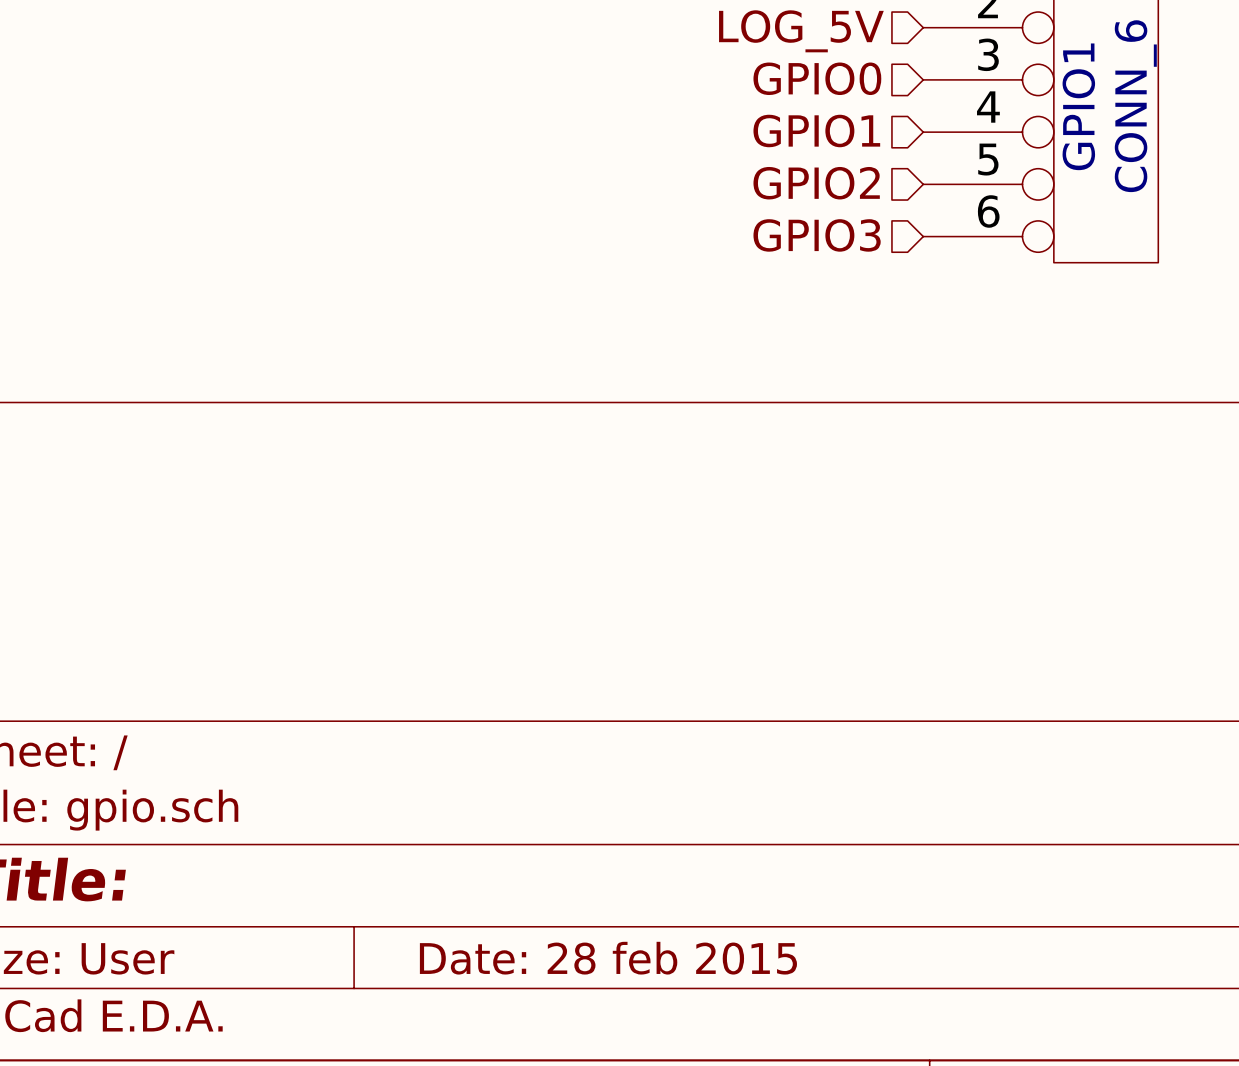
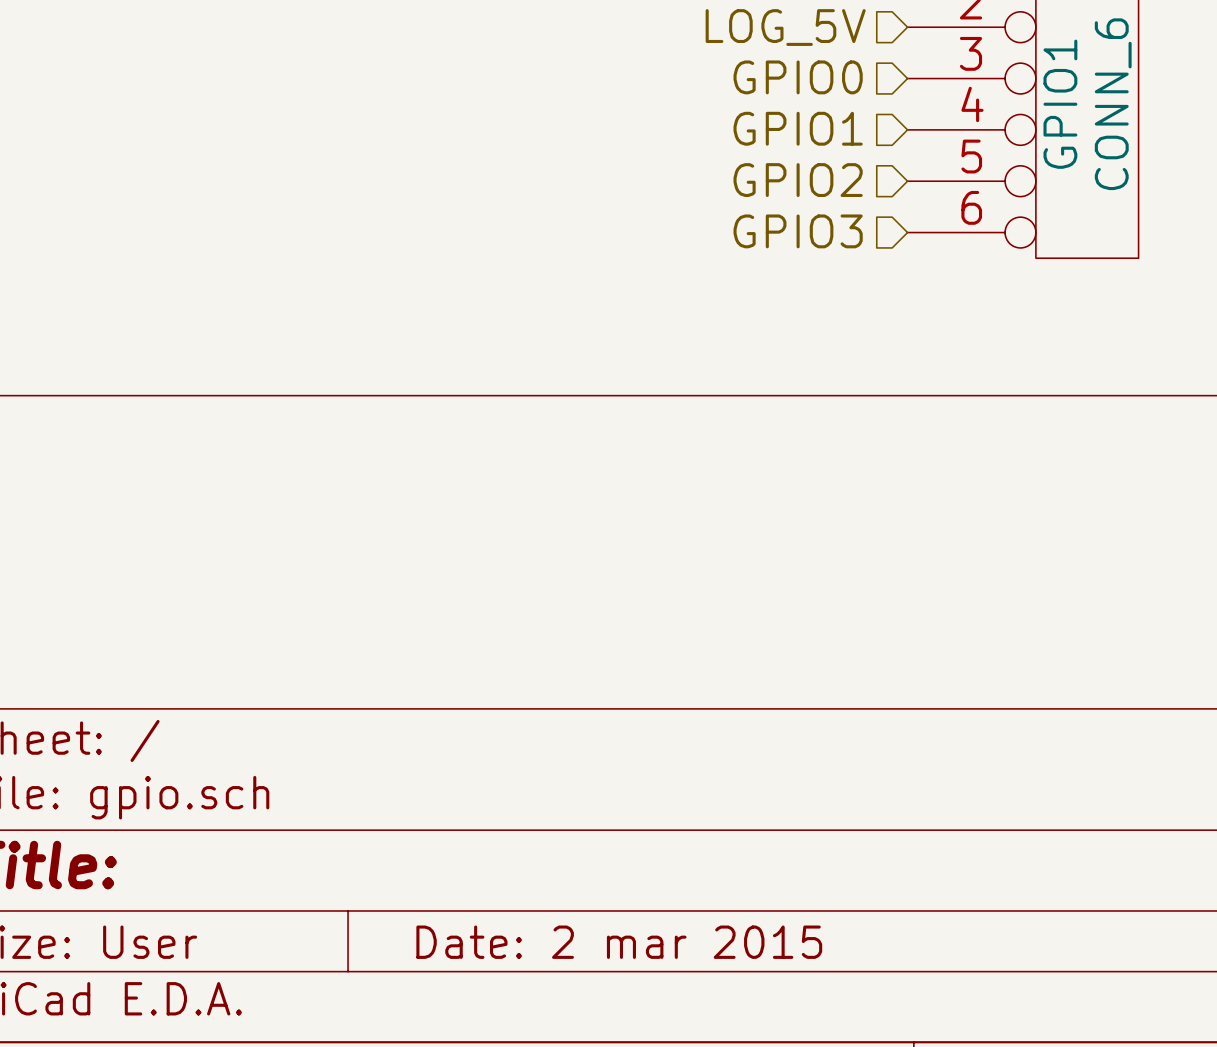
title block: Date: 28 feb 2015 (608, 958) -> Date: 2 mar 2015 (619, 942)

